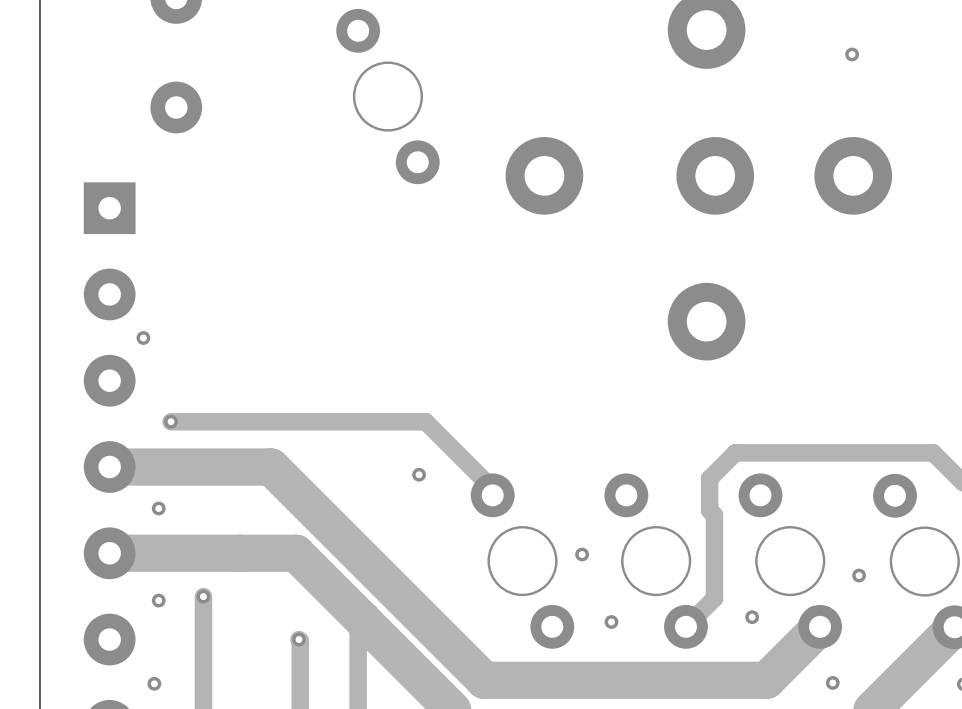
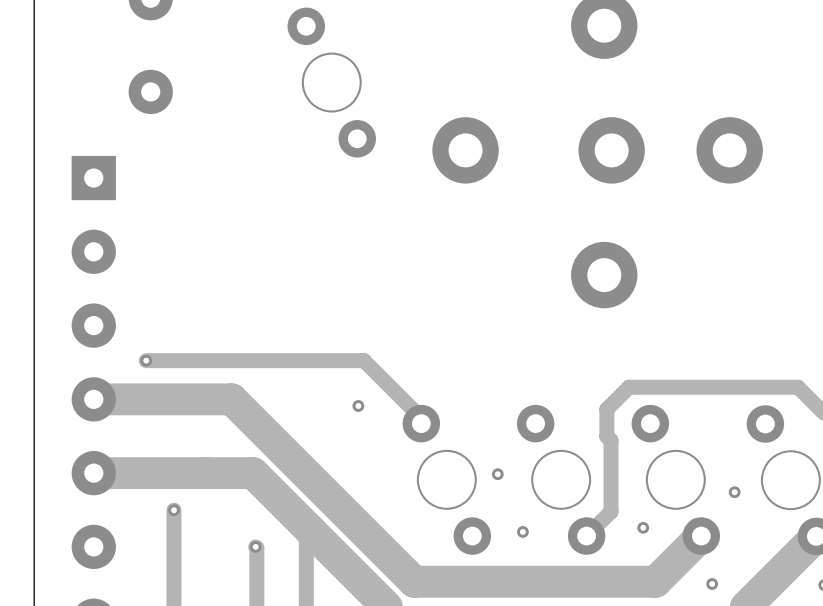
via: (852, 54) -> none
via: (143, 338) -> none
via: (158, 508) -> none
via: (158, 600) -> none
via: (154, 683) -> none

